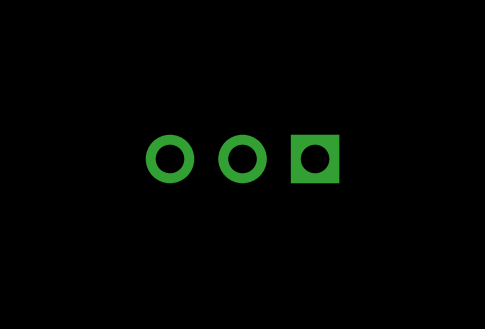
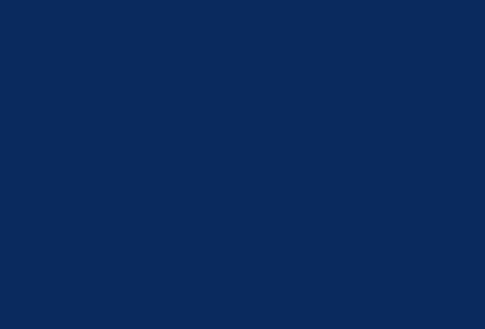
part: (242, 158) -> none

